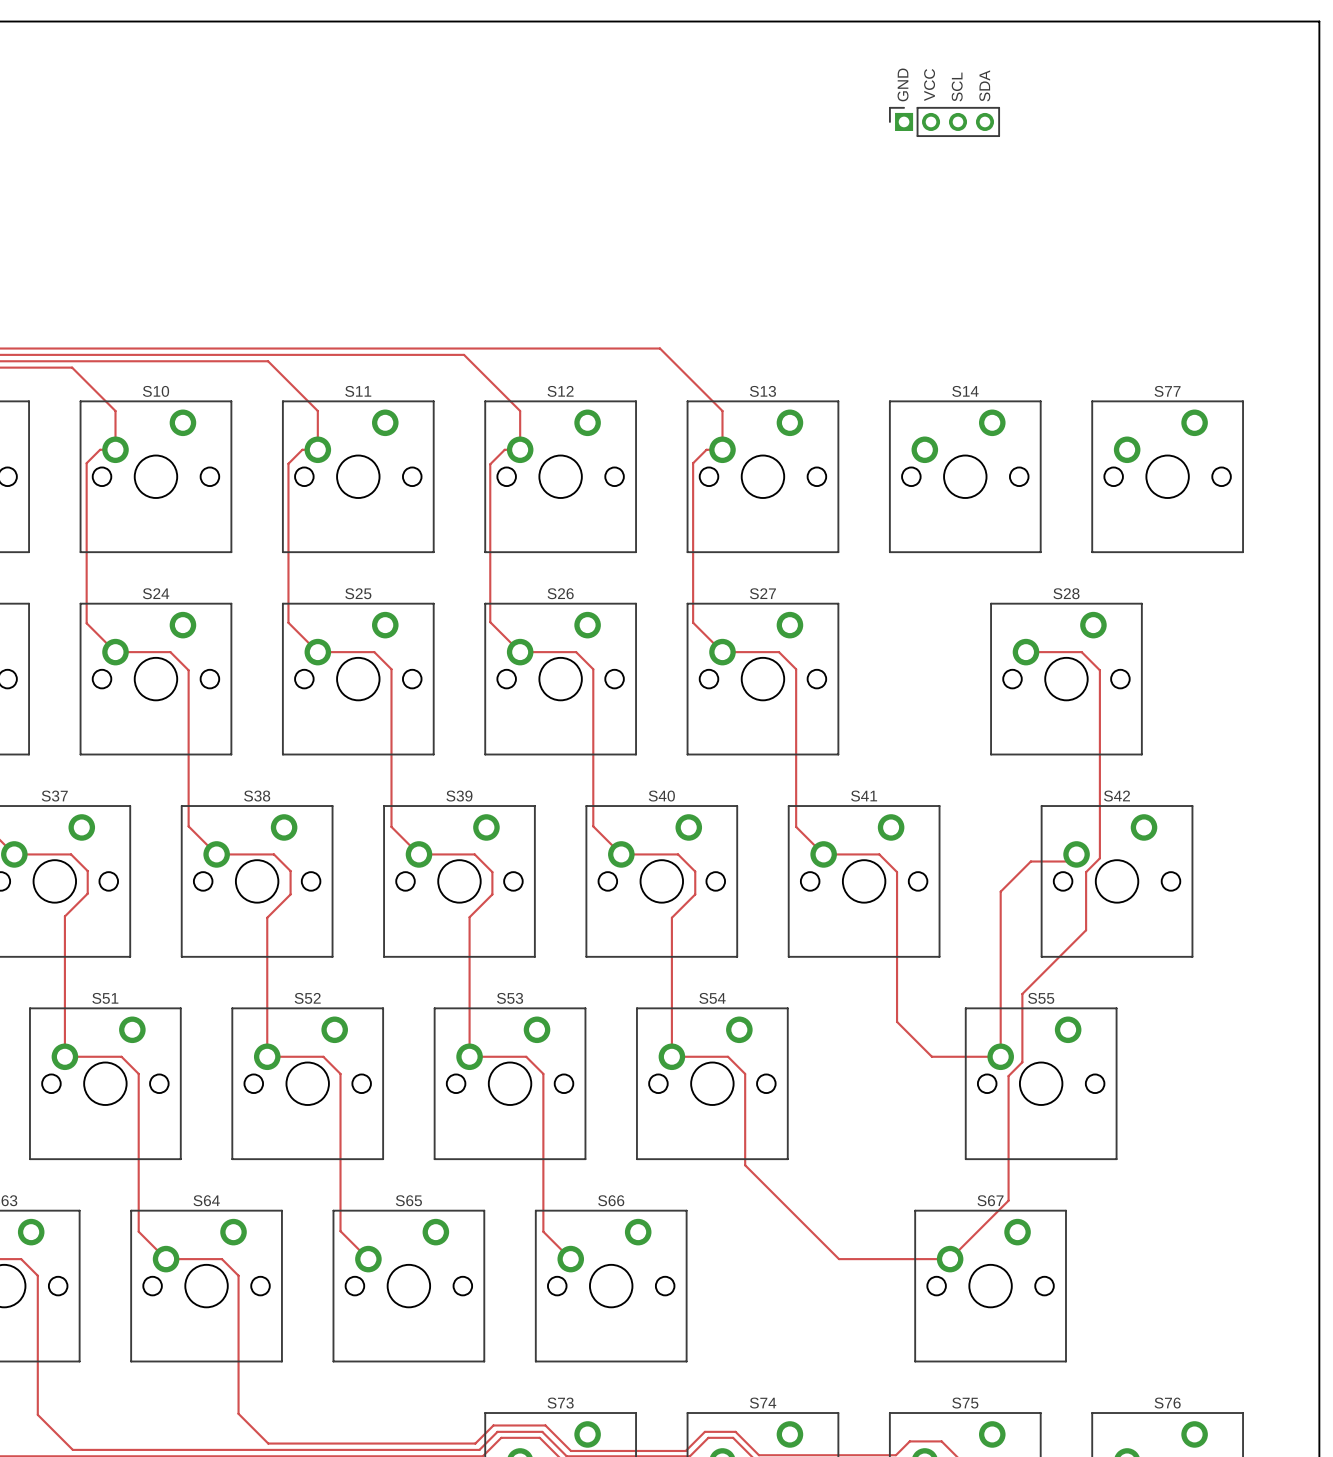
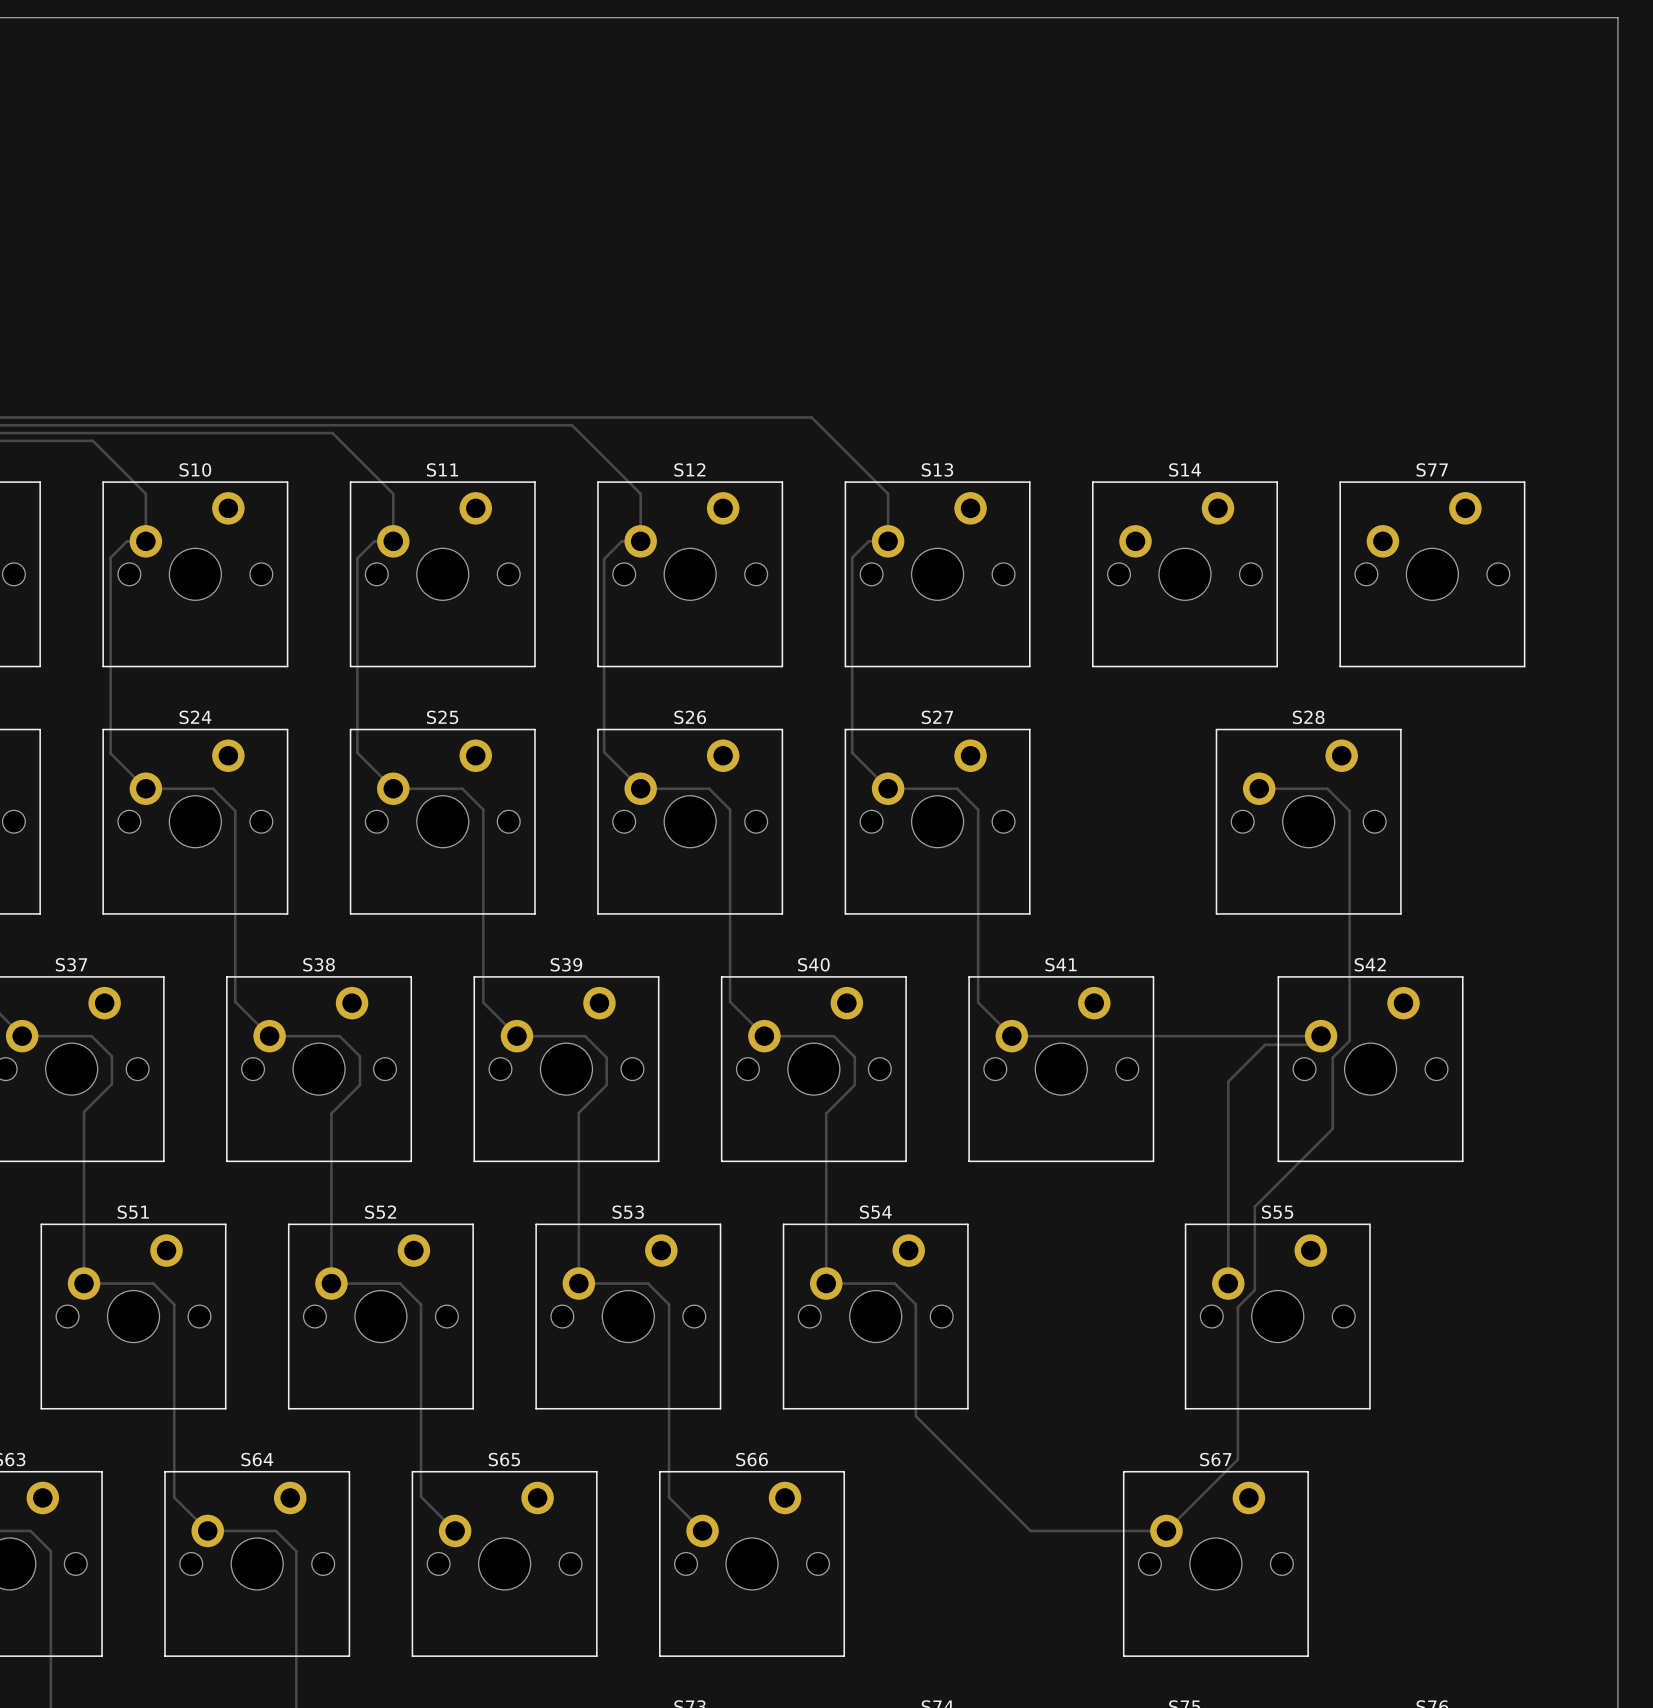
text: GND (903, 84) -> none
text: VCC (929, 85) -> none
text: SDA (984, 85) -> none
text: SCL (957, 86) -> none
part: (944, 121) -> none
track: (879, 854) (897, 872) (897, 1021) (931, 1056) (1000, 1056) -> (1079, 1036) (1321, 1036)

